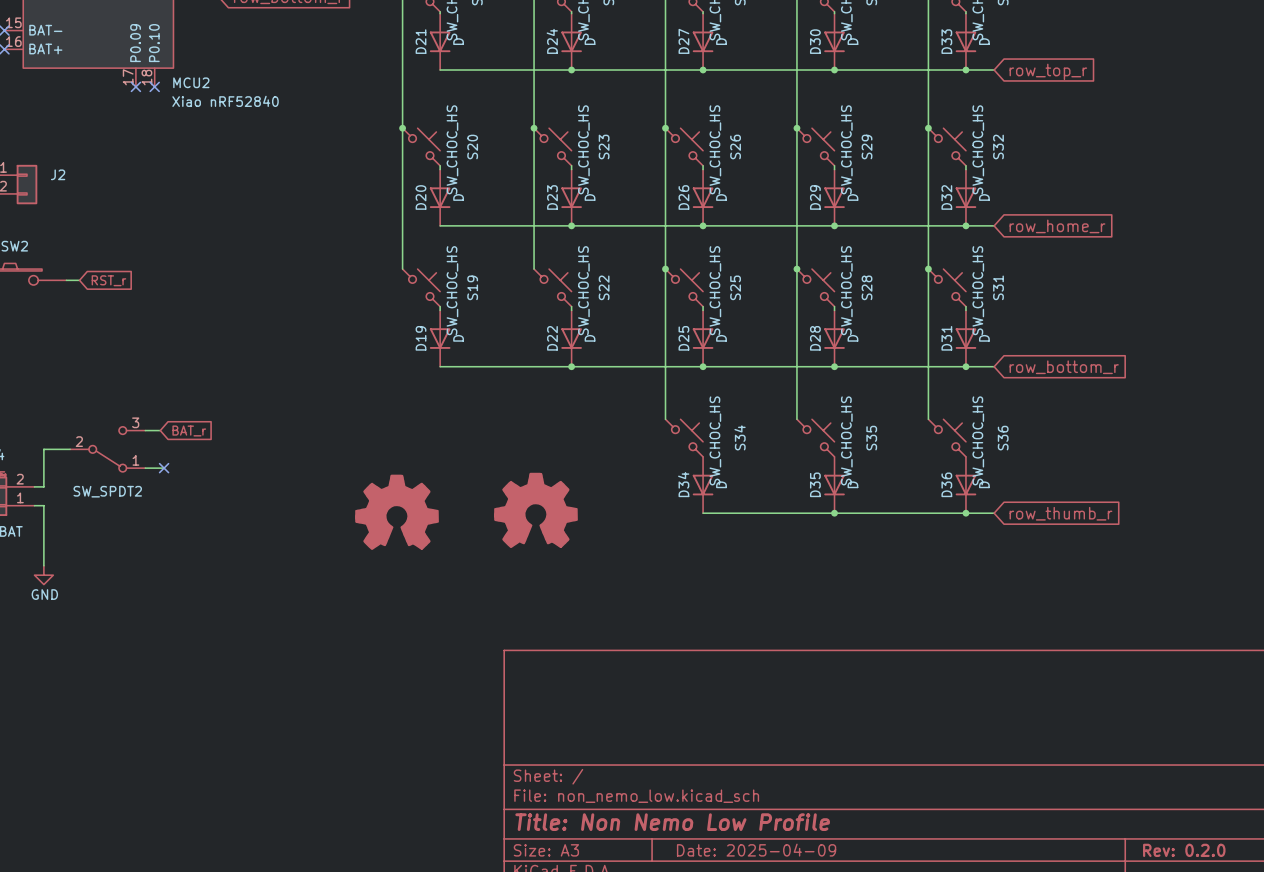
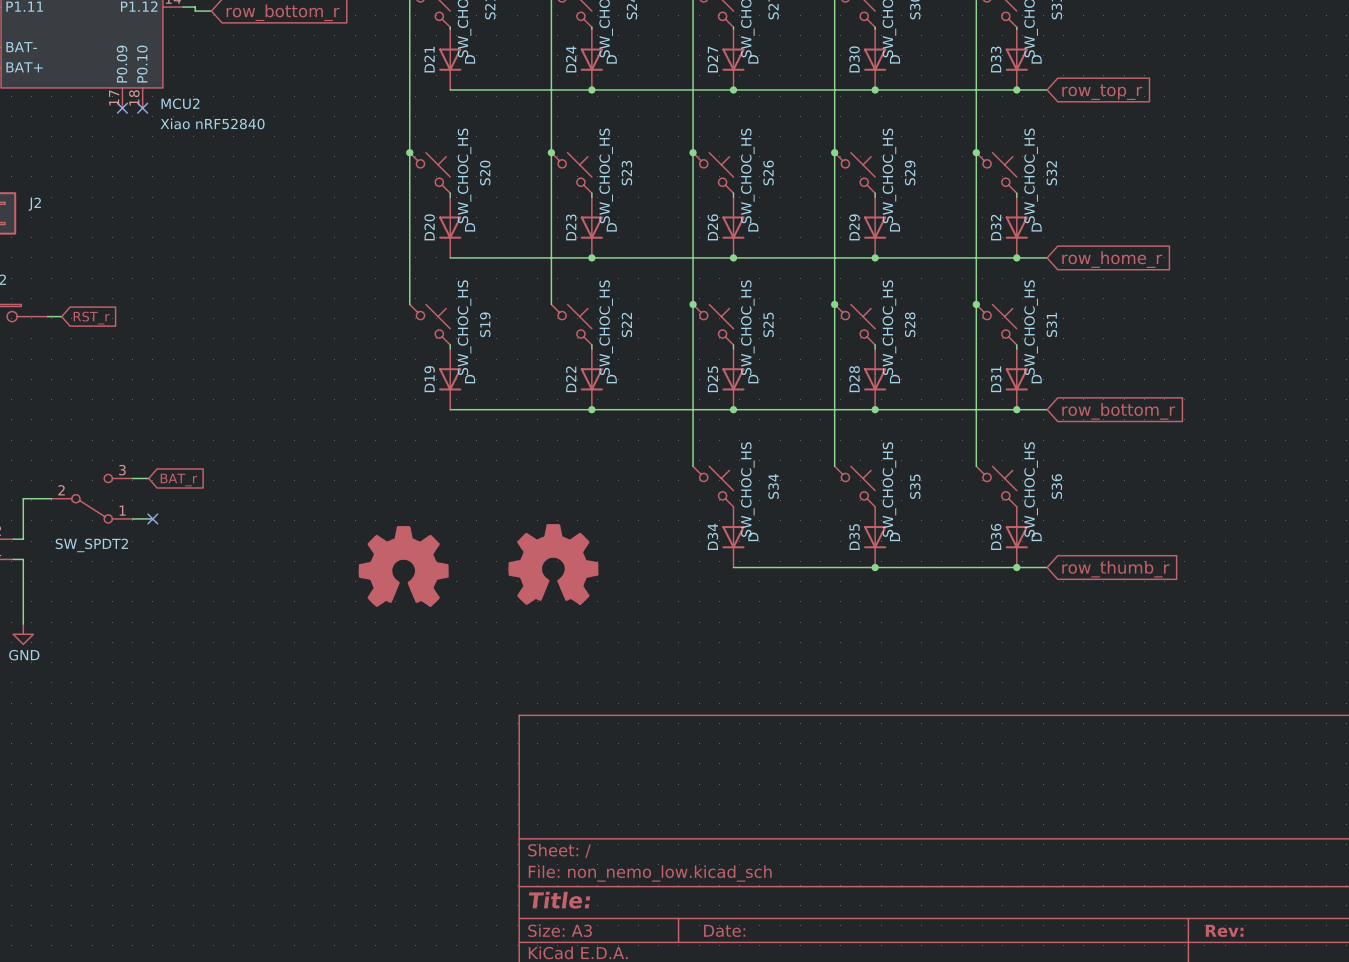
title block: Title: Non Nemo Low Profile (672, 822) -> Title: (559, 900)
title block: Date: 2025-04-09 (756, 850) -> Date: (724, 930)
title block: Rev: 0.2.0 (1184, 850) -> Rev: (1224, 930)

